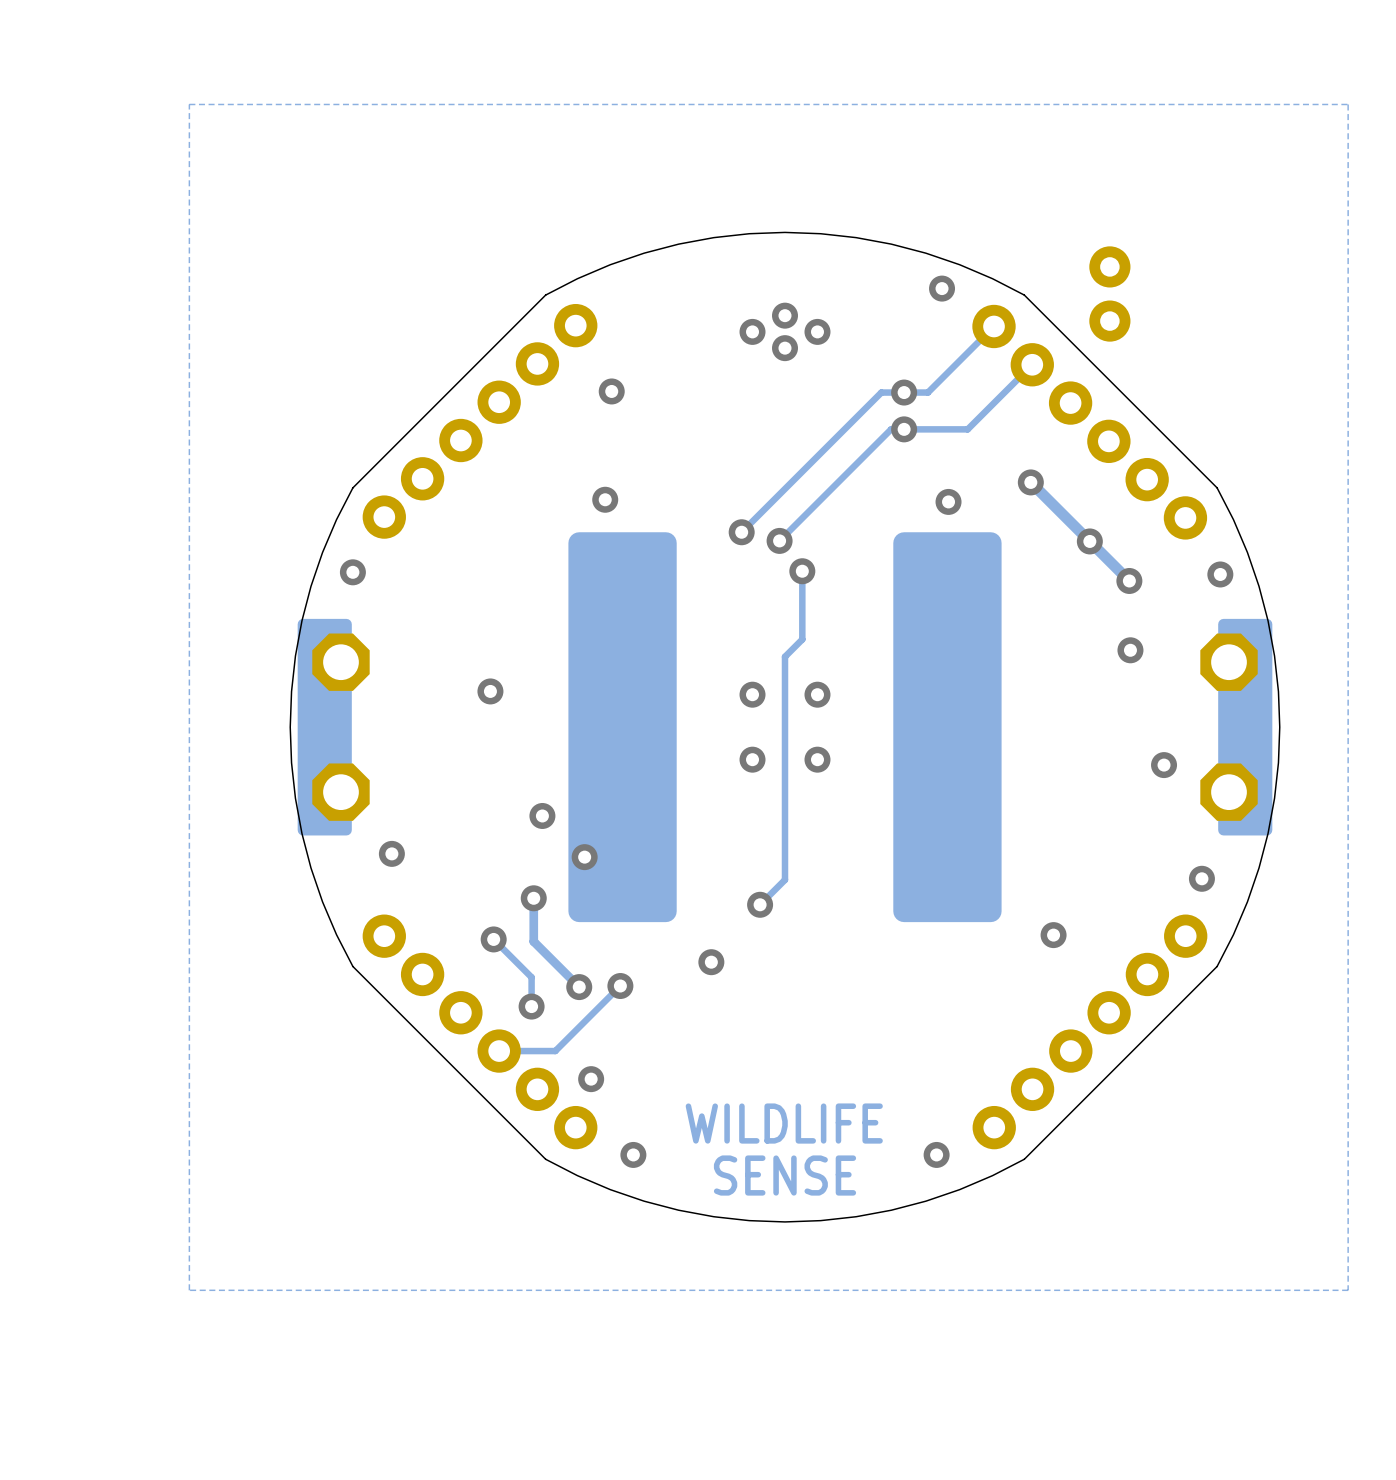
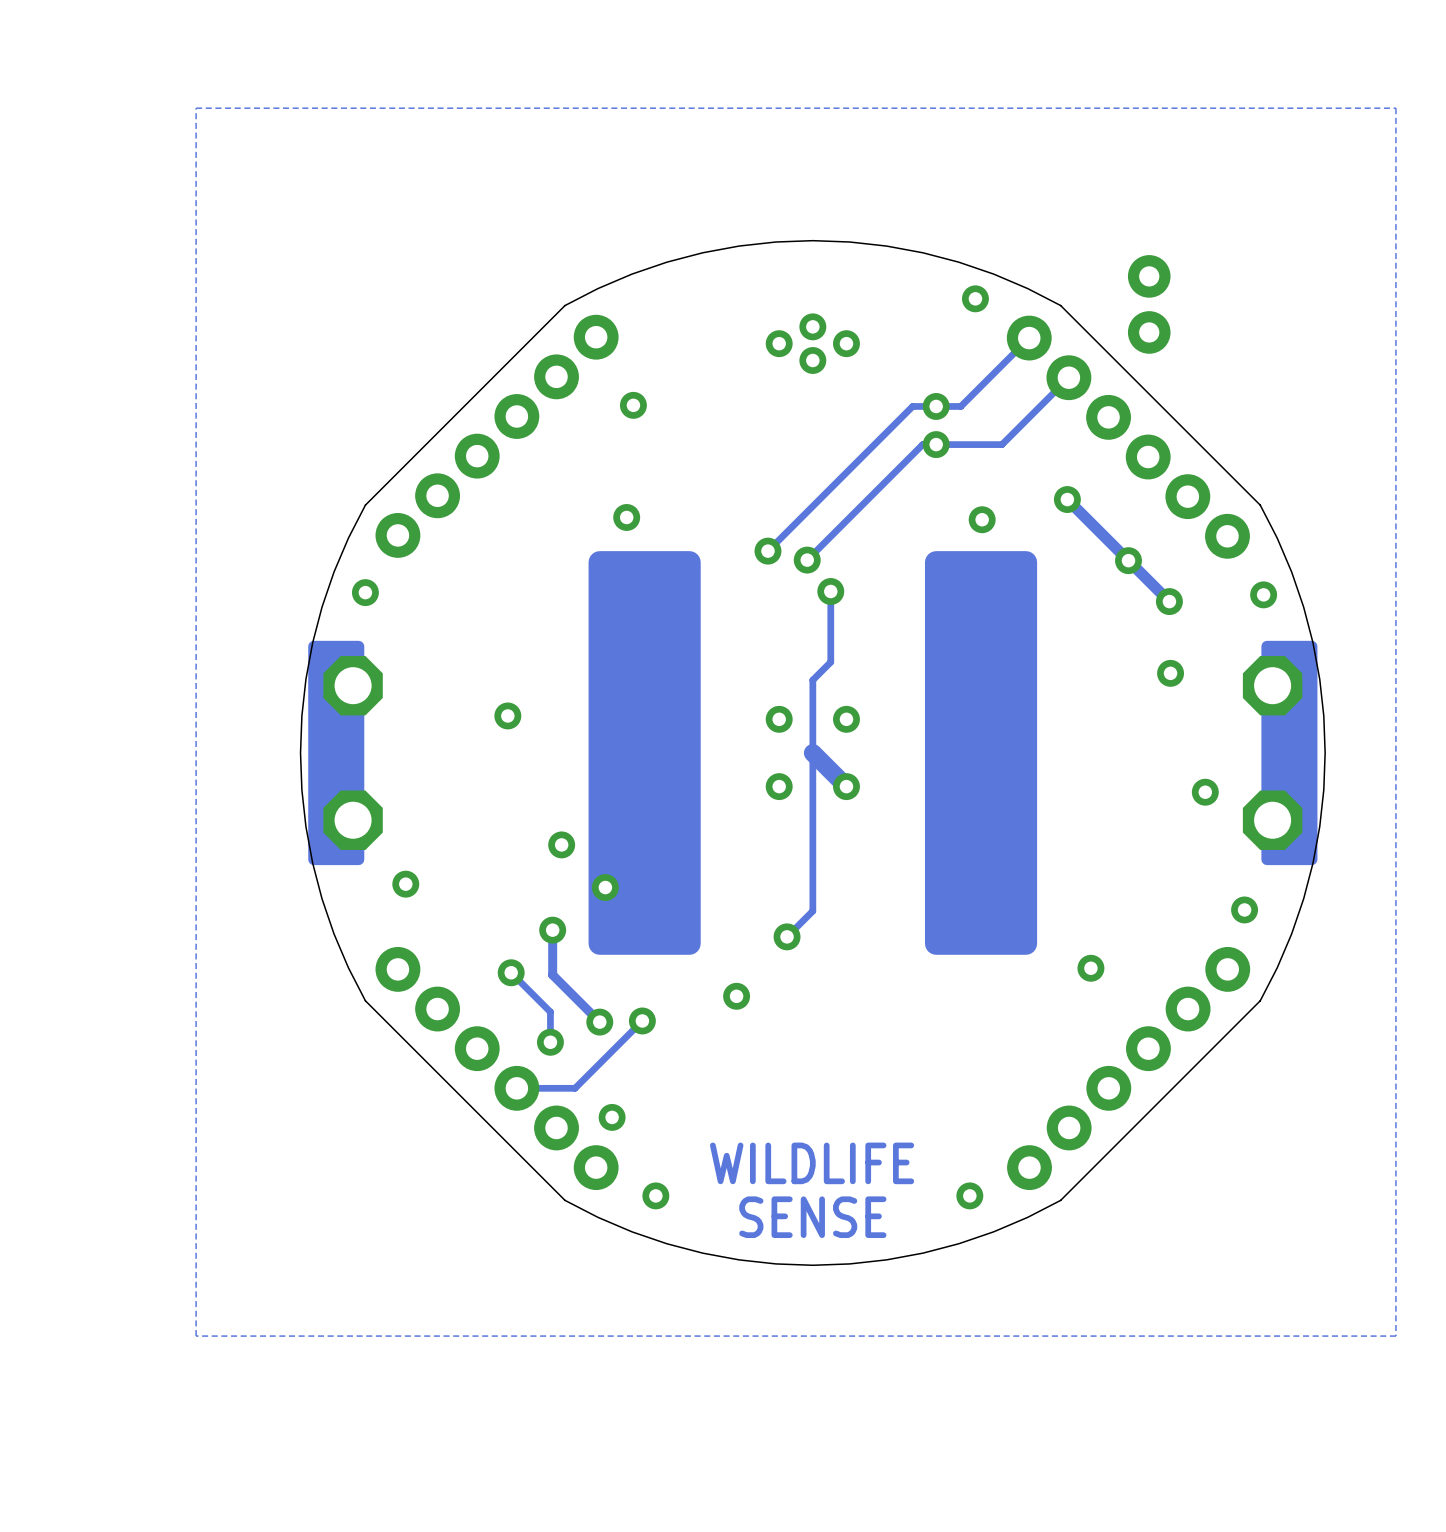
track: none -> (812, 752) (846, 786)

